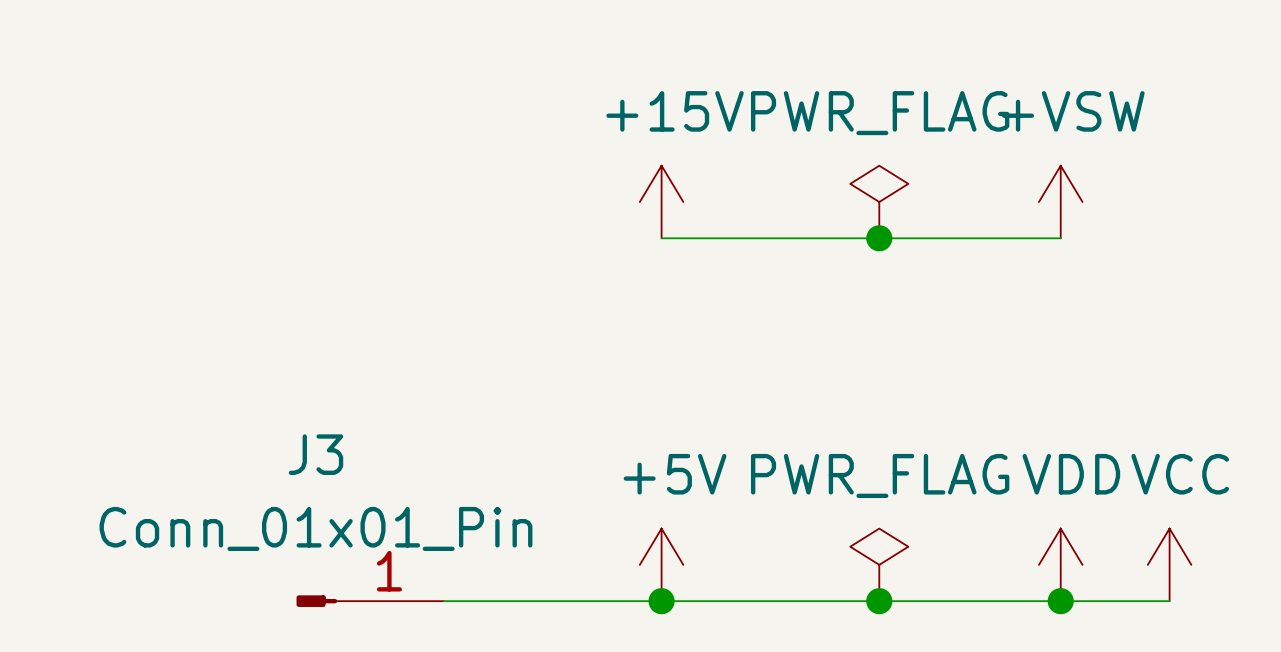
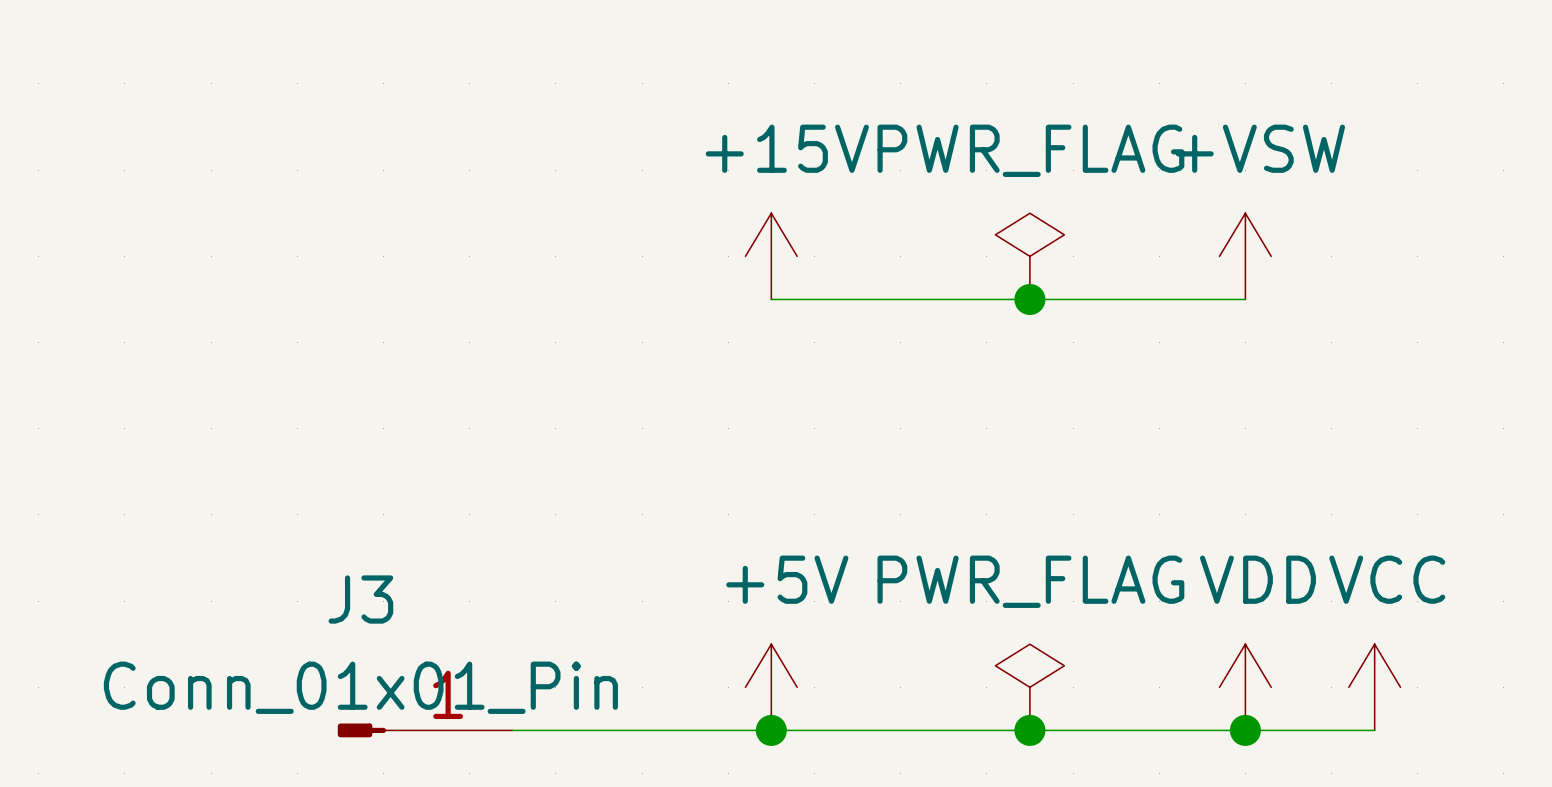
J3 name position: J3 (315, 454) -> J3 (360, 599)
J3 value position: Conn_01x01_Pin (315, 528) -> Conn_01x01_Pin (360, 687)

